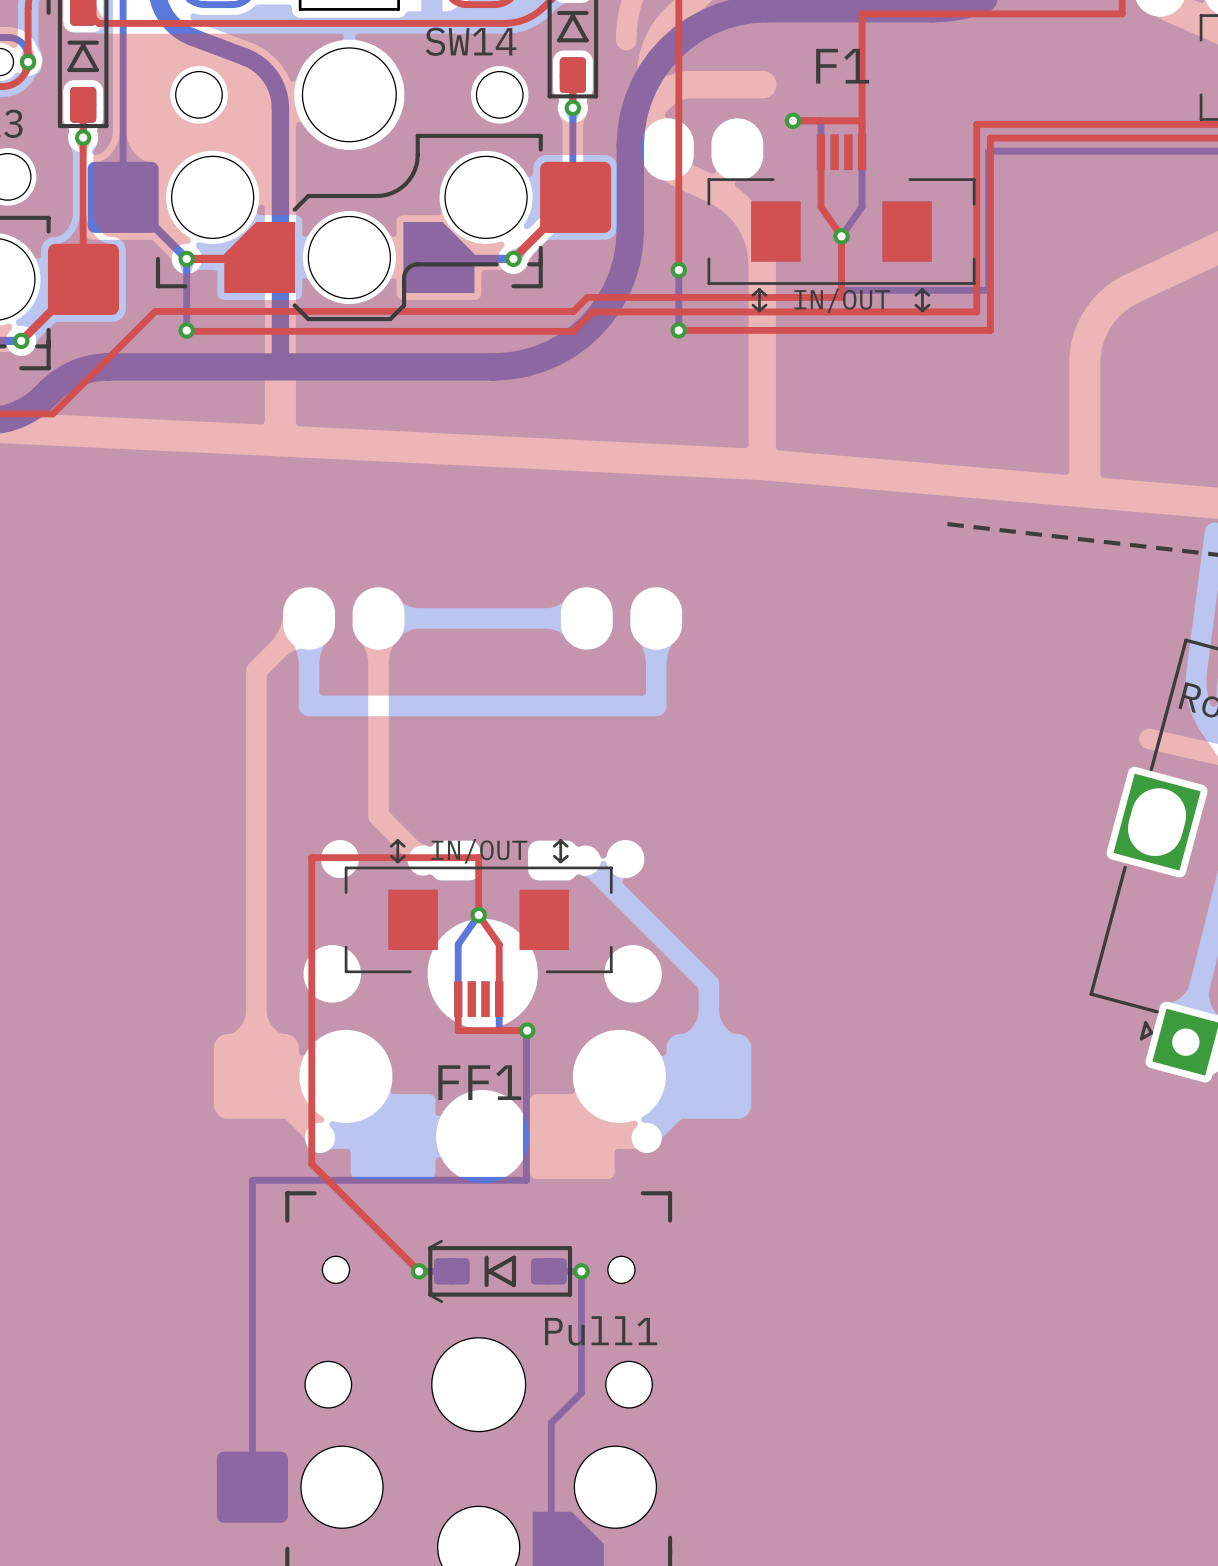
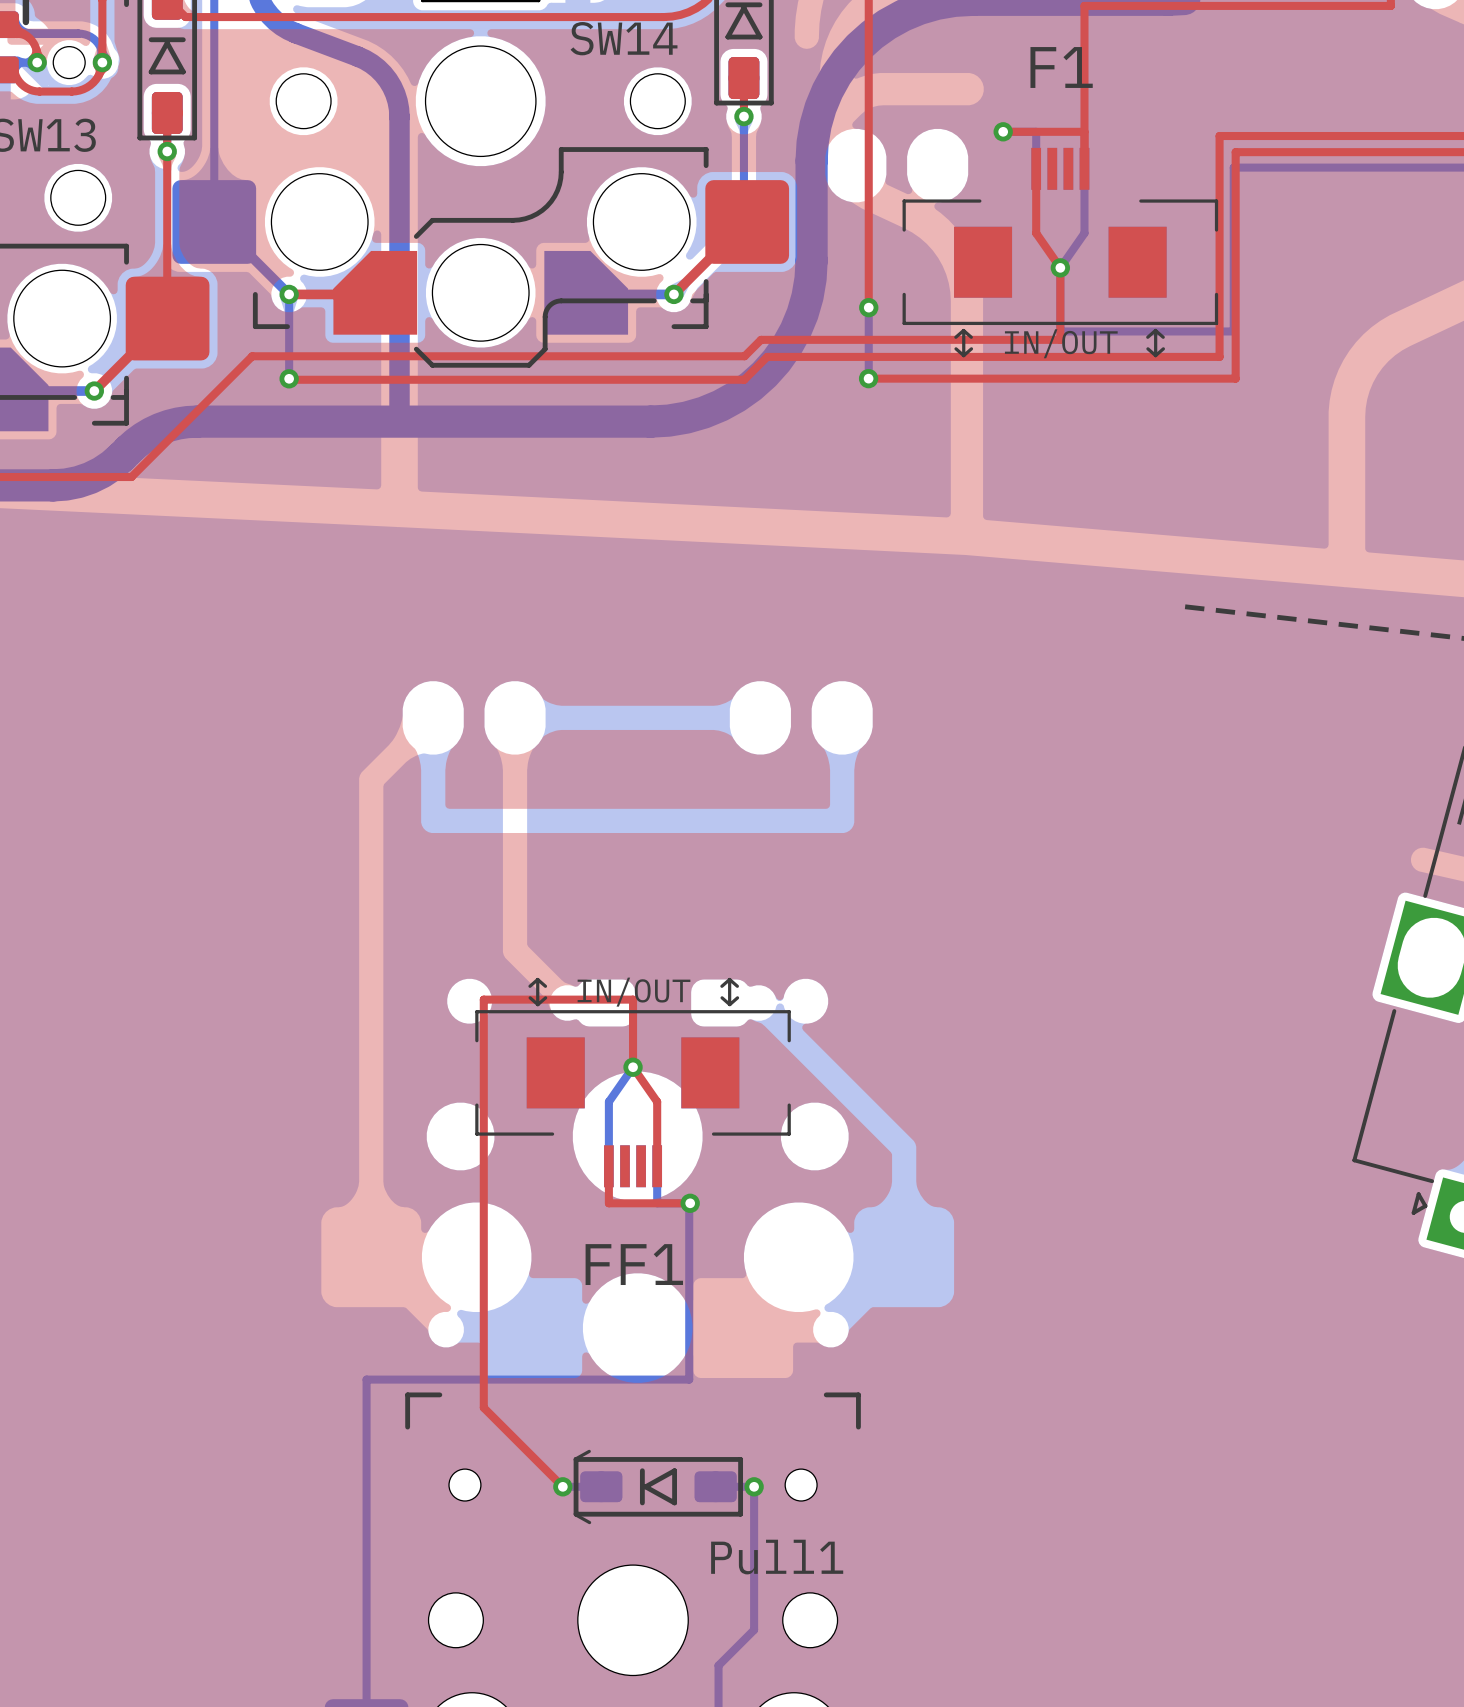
top track: (351, 857) (311, 857) (311, 1164) (351, 1204) -> (483, 999) (483, 1407)

